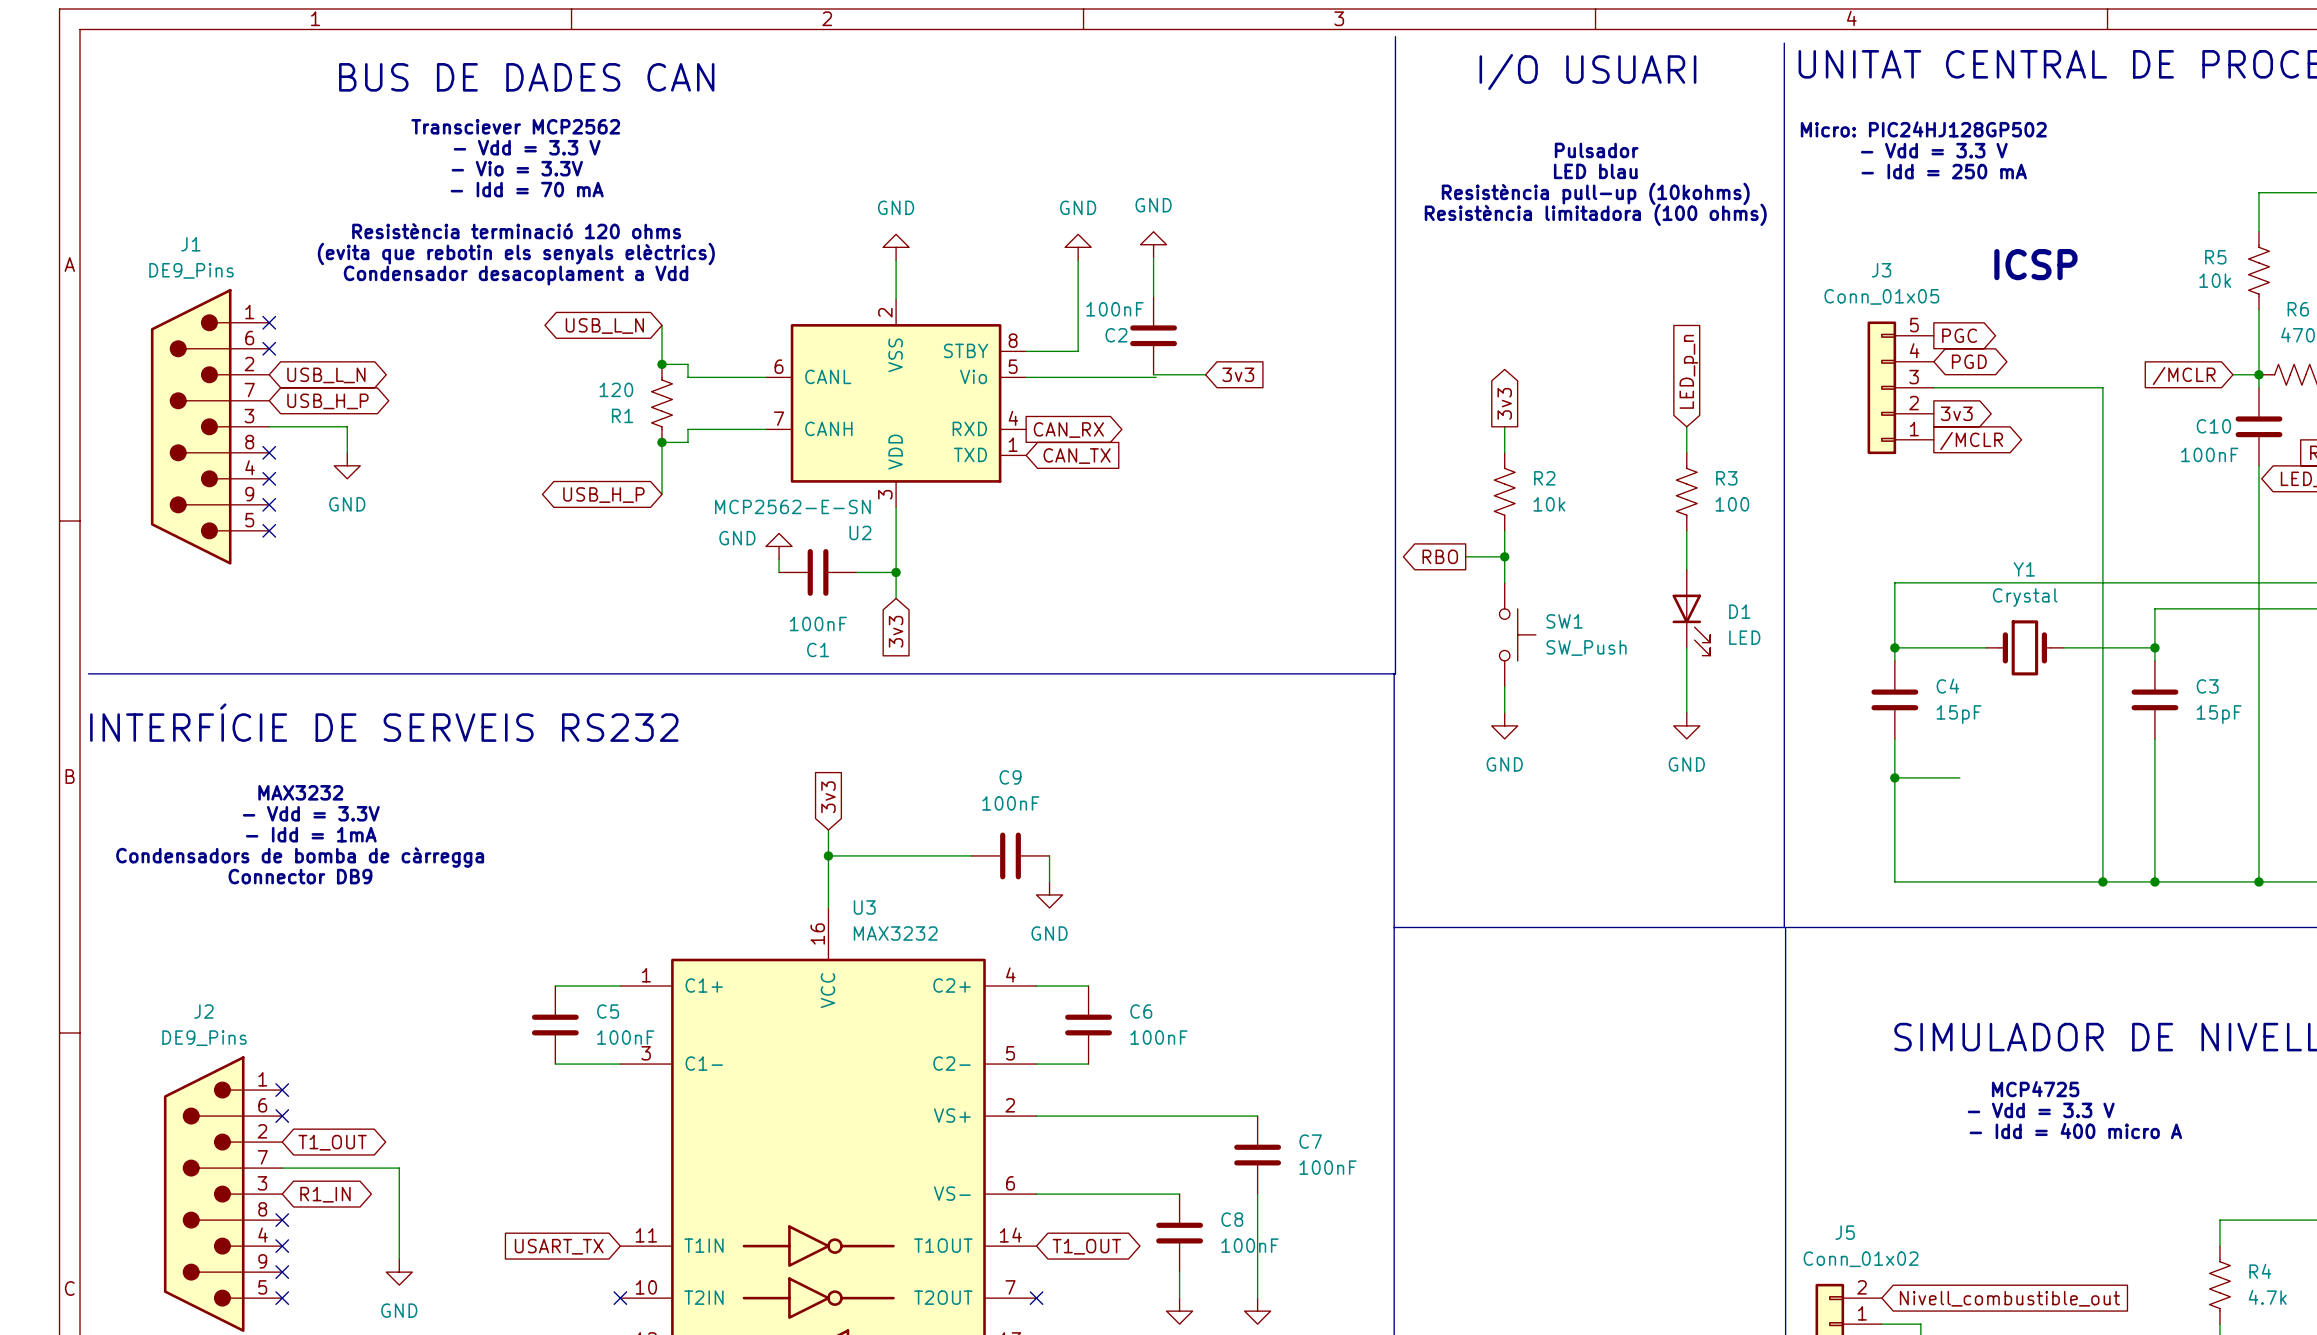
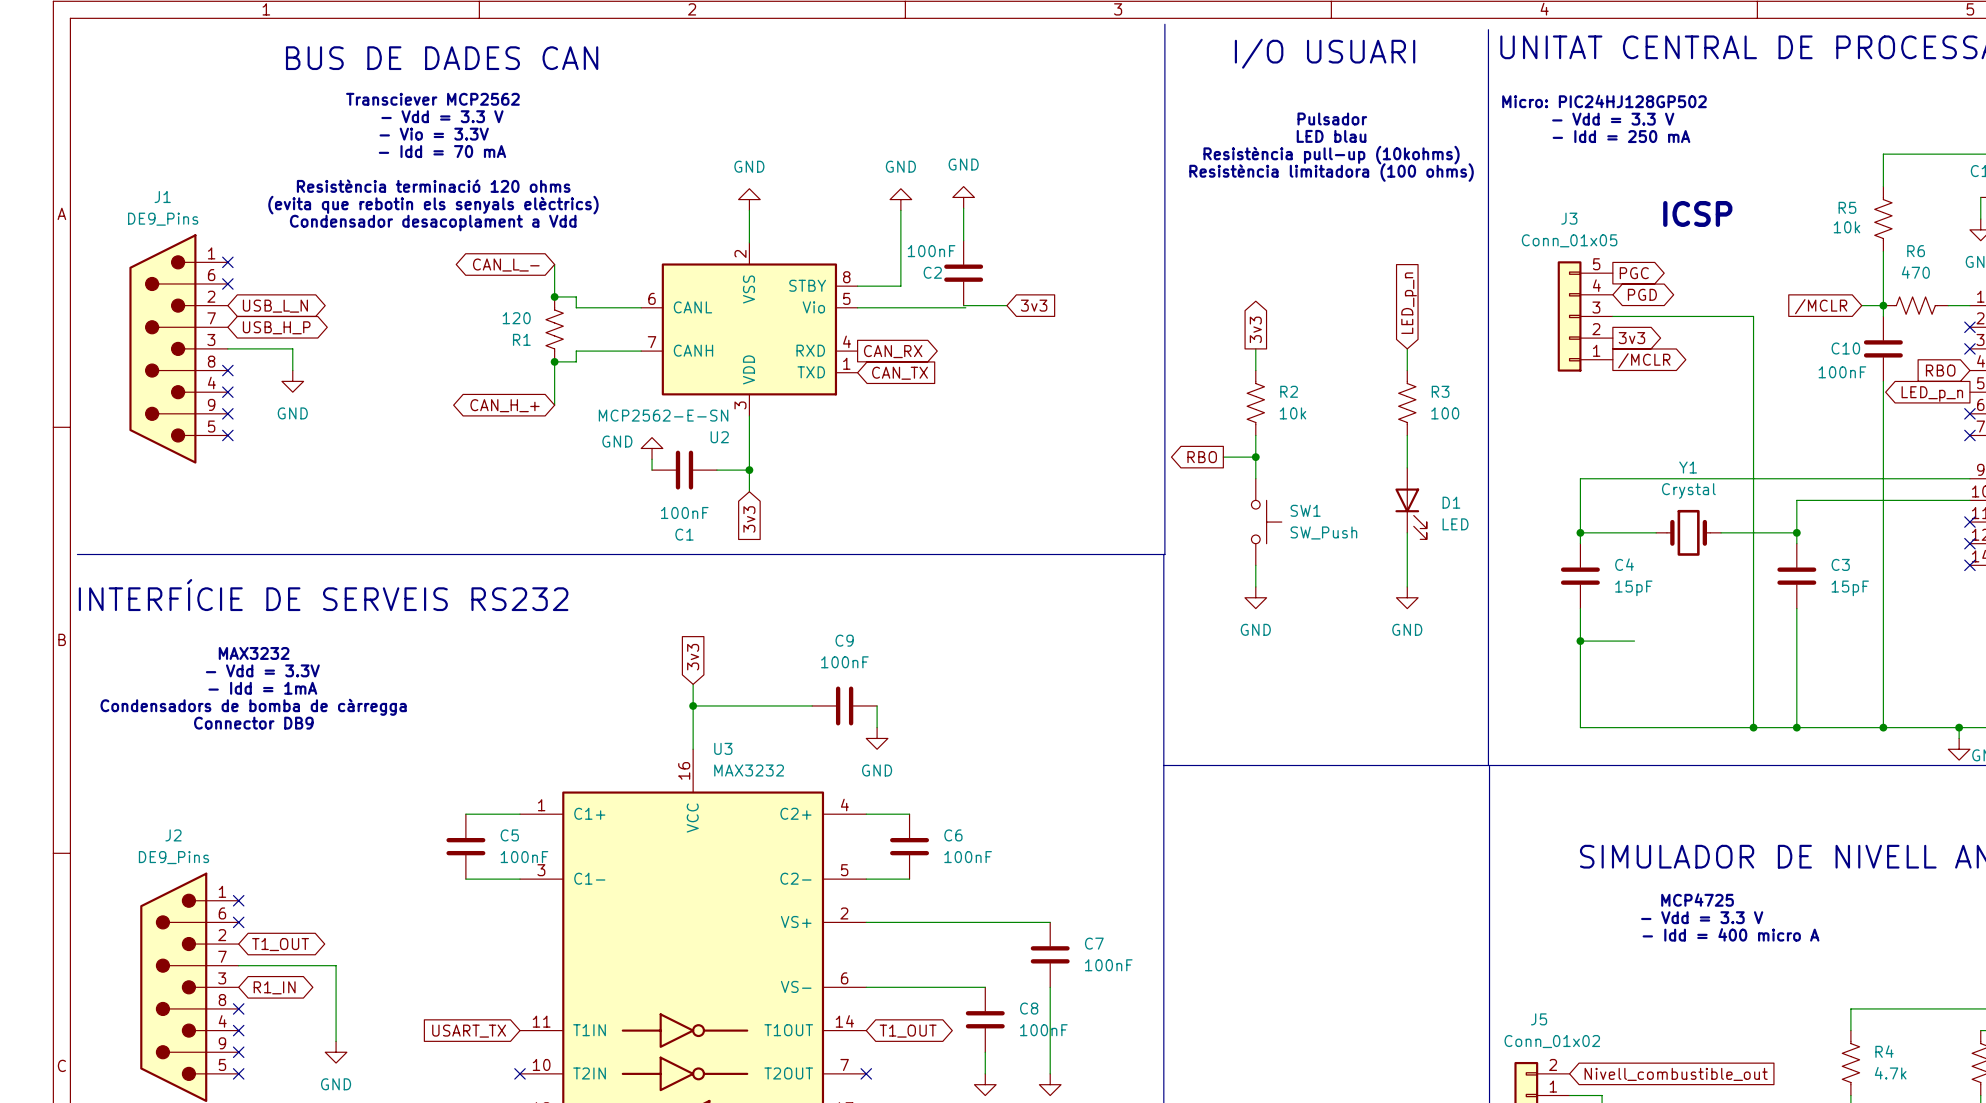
global label: USB_L_N (604, 325) -> CAN_L_- (506, 265)
global label: USB_H_P (603, 495) -> CAN_H_+ (505, 405)

